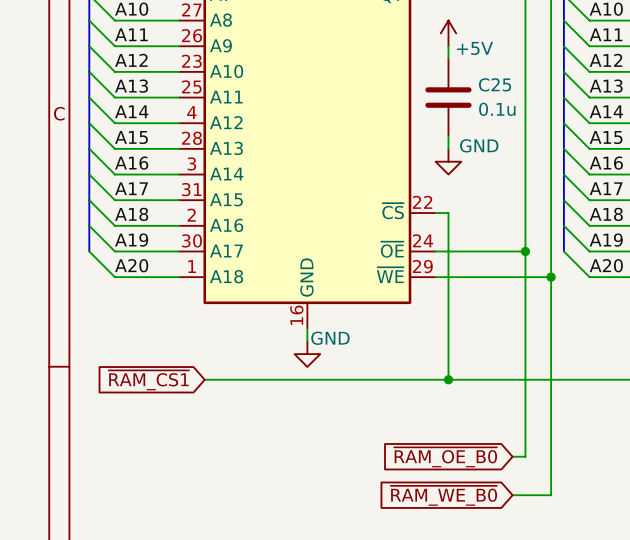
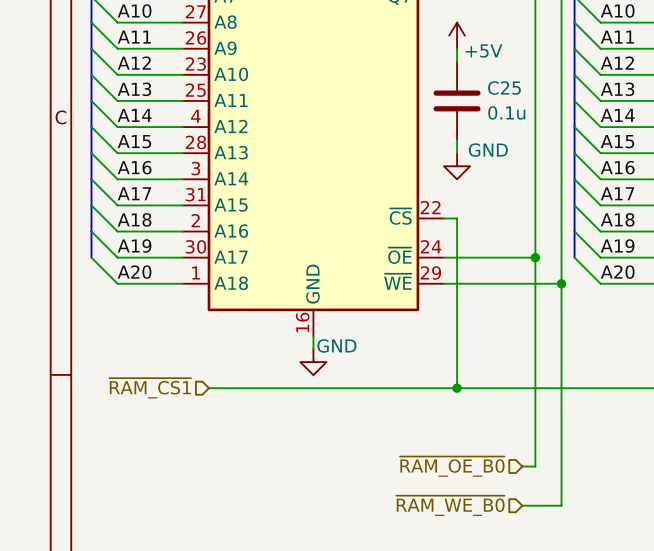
hierarchical label: none -> ~{RAM_CS1} (150, 388)
global label: ~{RAM_CS1} (148, 380) -> none
hierarchical label: none -> ~{RAM_OE_B0} (452, 466)
global label: ~{RAM_OE_B0} (445, 457) -> none
hierarchical label: none -> ~{RAM_WE_B0} (450, 505)
global label: ~{RAM_WE_B0} (443, 495) -> none

